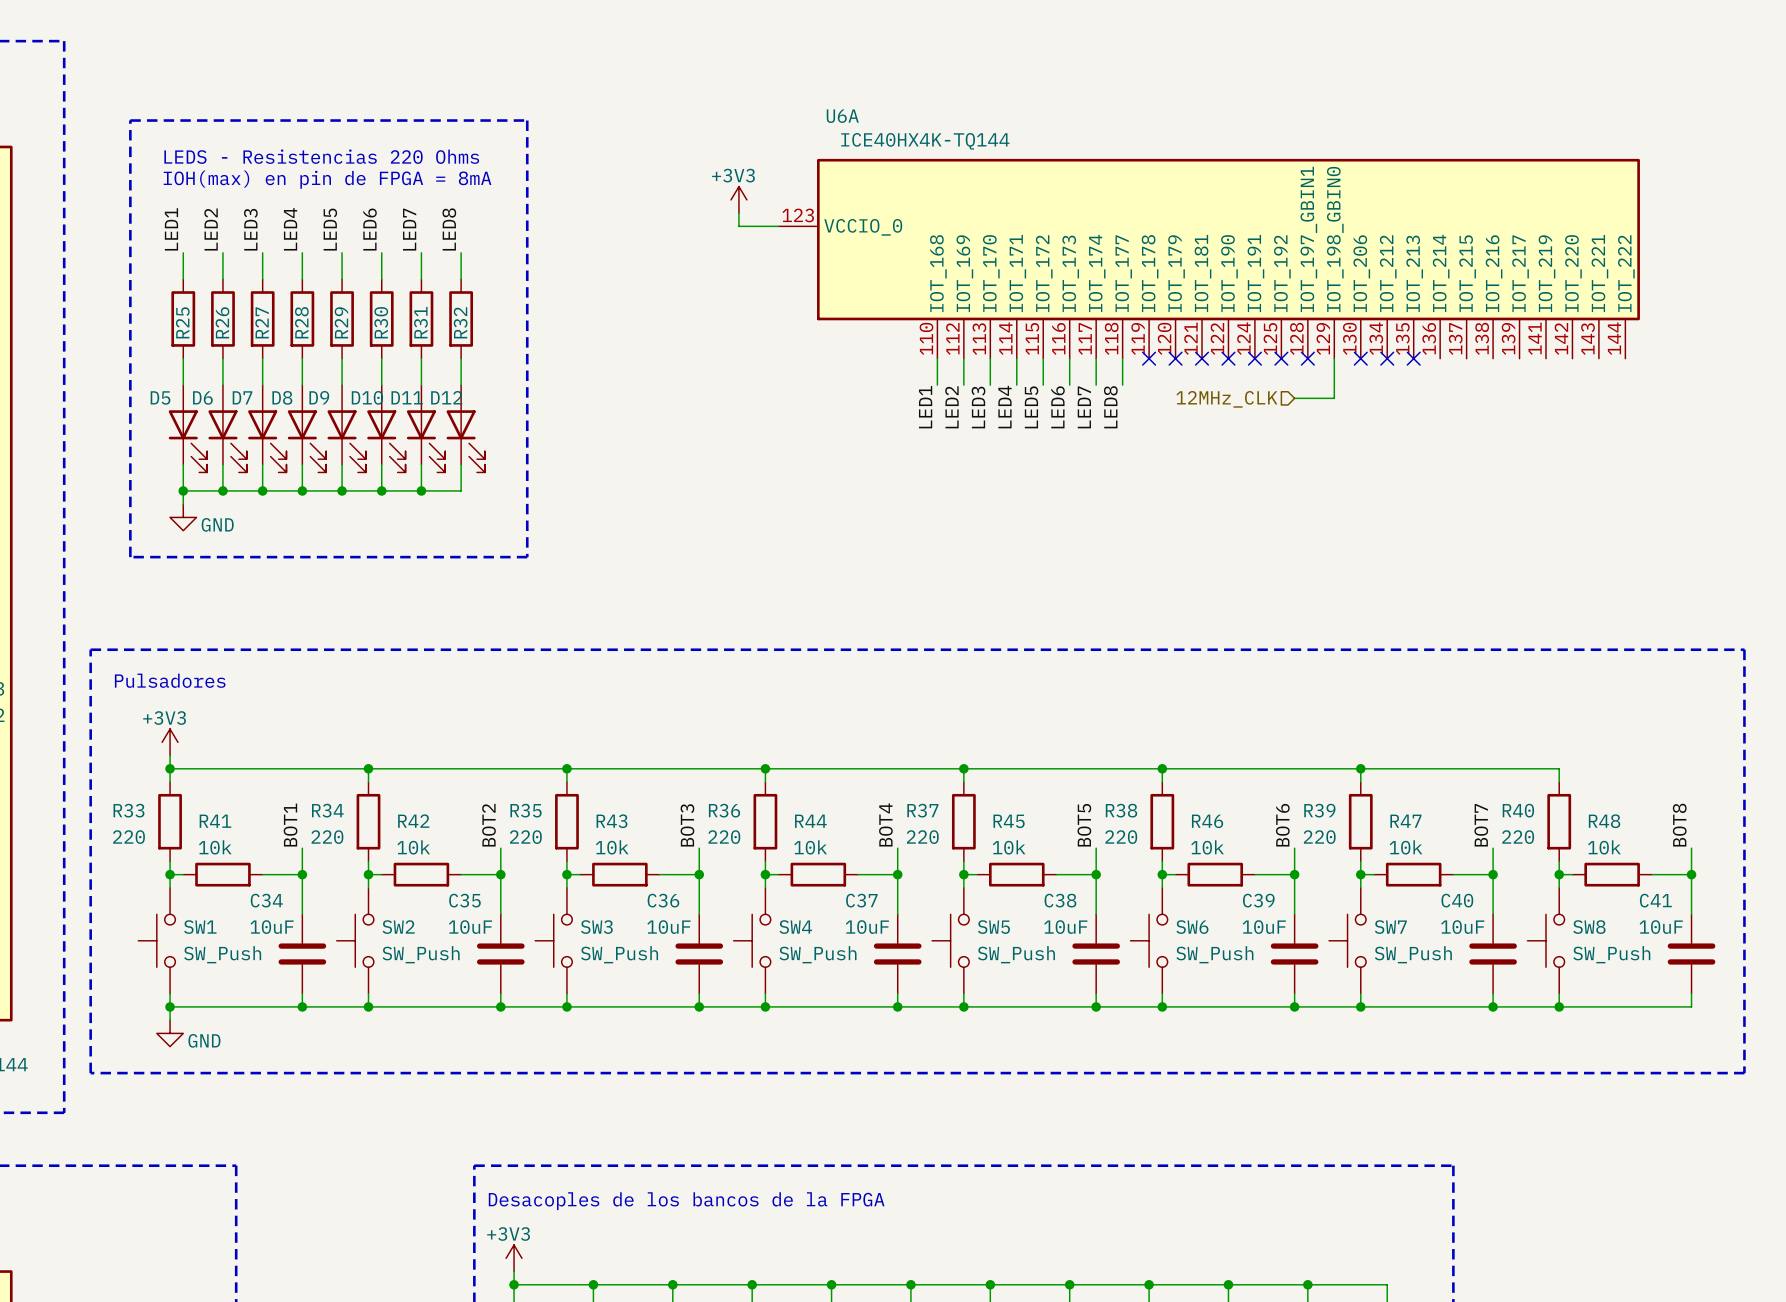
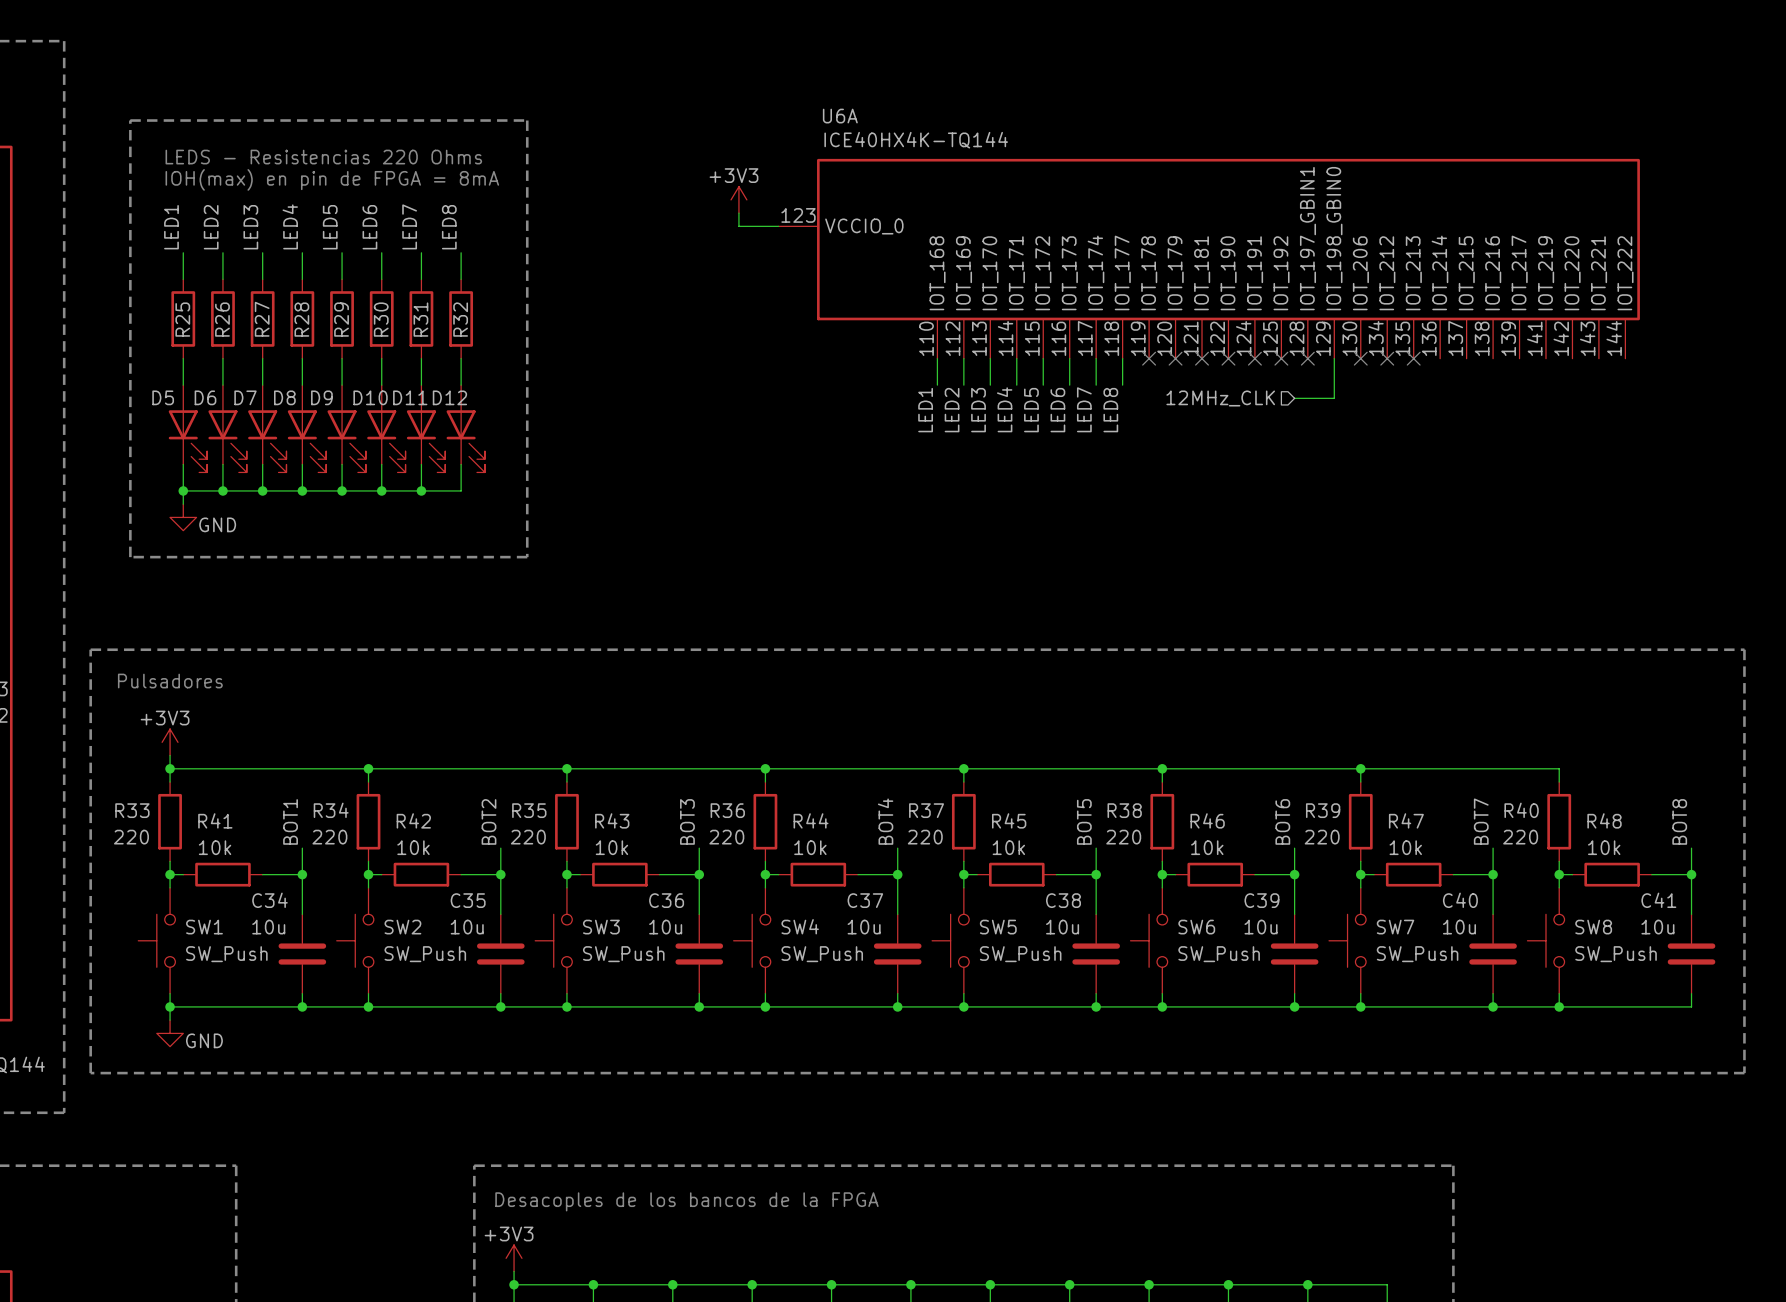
C34 value: 10uF (272, 927) -> 10u (268, 927)
C35 value: 10uF (470, 927) -> 10u (467, 927)
C36 value: 10uF (668, 927) -> 10u (665, 927)
C37 value: 10uF (867, 927) -> 10u (864, 927)
C38 value: 10uF (1065, 927) -> 10u (1062, 927)
C39 value: 10uF (1264, 927) -> 10u (1261, 927)
C40 value: 10uF (1462, 927) -> 10u (1459, 927)
C41 value: 10uF (1661, 927) -> 10u (1657, 927)

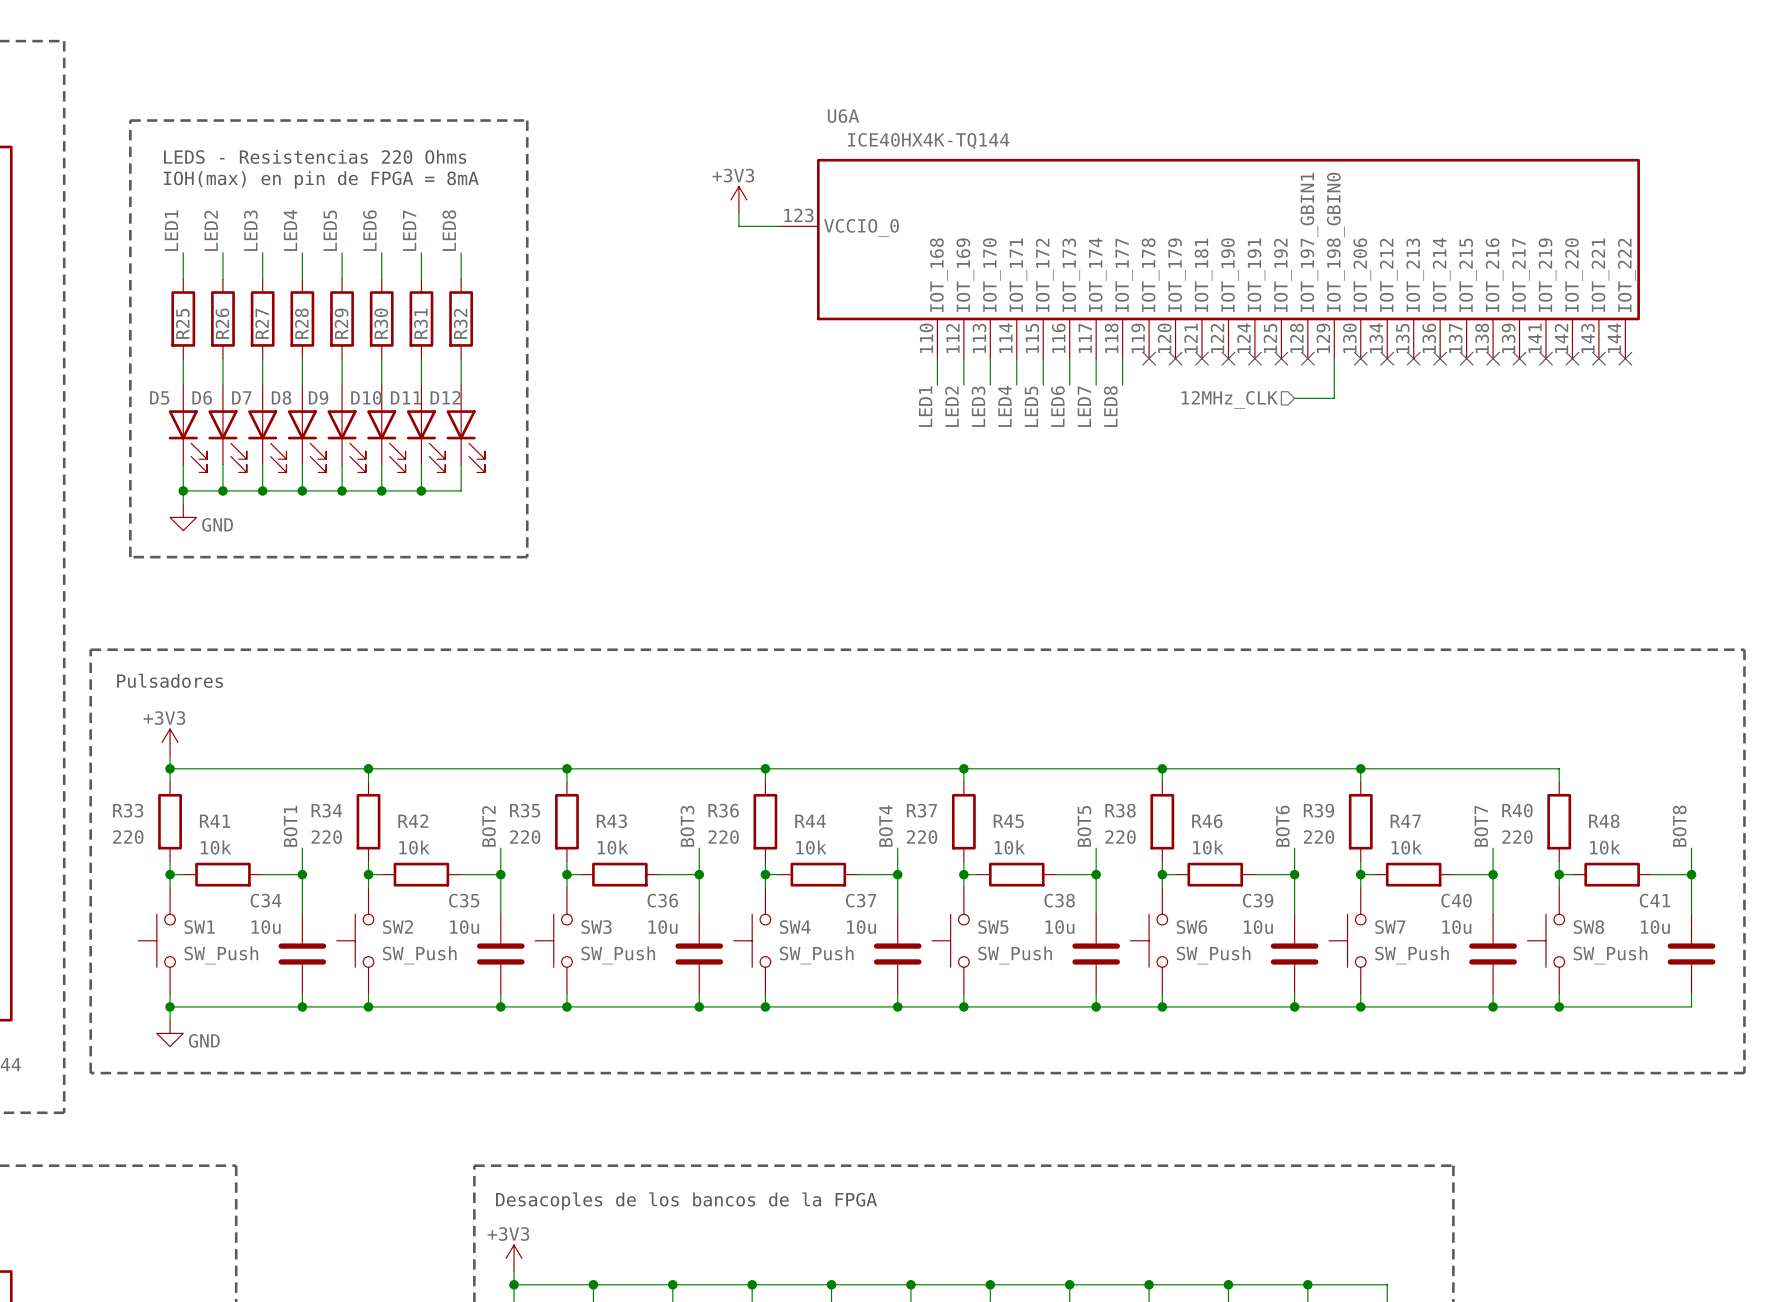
no-connect mark: none -> (1440, 358)
no-connect mark: none -> (1466, 358)
no-connect mark: none -> (1493, 358)
no-connect mark: none -> (1519, 358)
no-connect mark: none -> (1545, 358)
no-connect mark: none -> (1572, 358)
no-connect mark: none -> (1598, 358)
no-connect mark: none -> (1625, 358)

